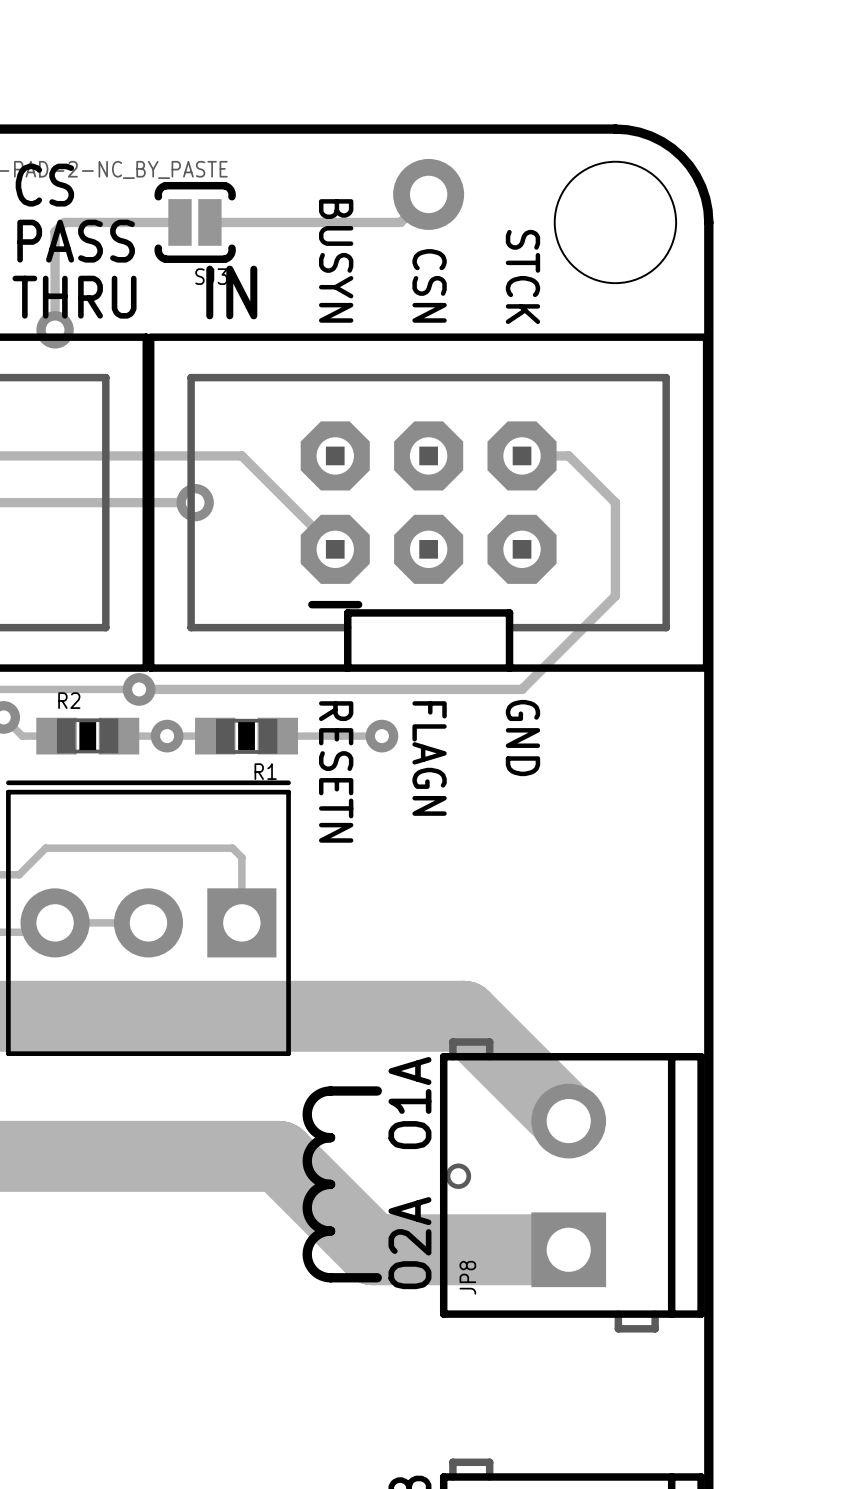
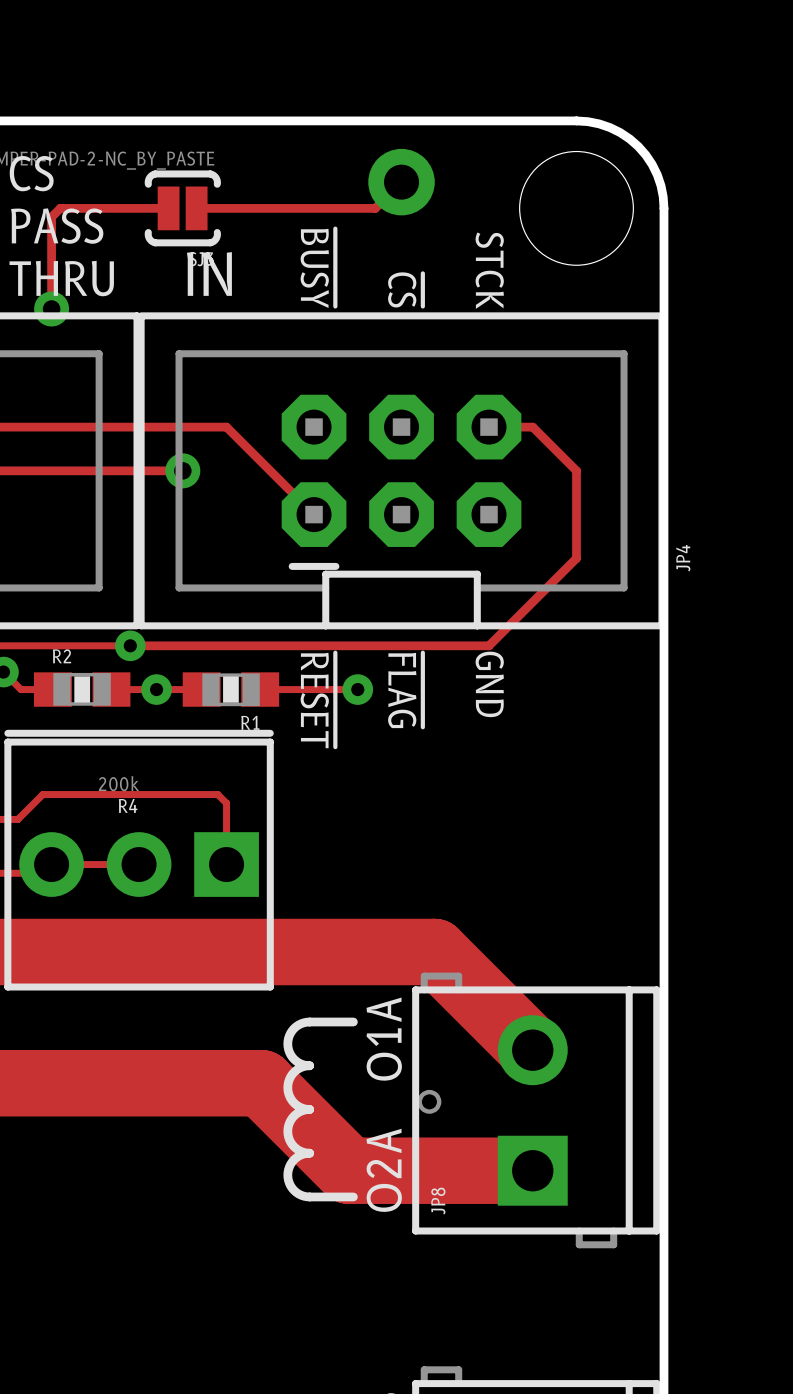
text: BUSYN (336, 260) -> ~{BUSY} (317, 268)
text: CSN (429, 285) -> ~{CS} (405, 289)
JP4 name: none -> JP4 (683, 558)
text: FLAGN (429, 758) -> ~{FLAG} (405, 690)
text: RESETN (336, 771) -> ~{RESET} (317, 700)
part: (148, 918) -> none
R4: none -> 200k (139, 860)

